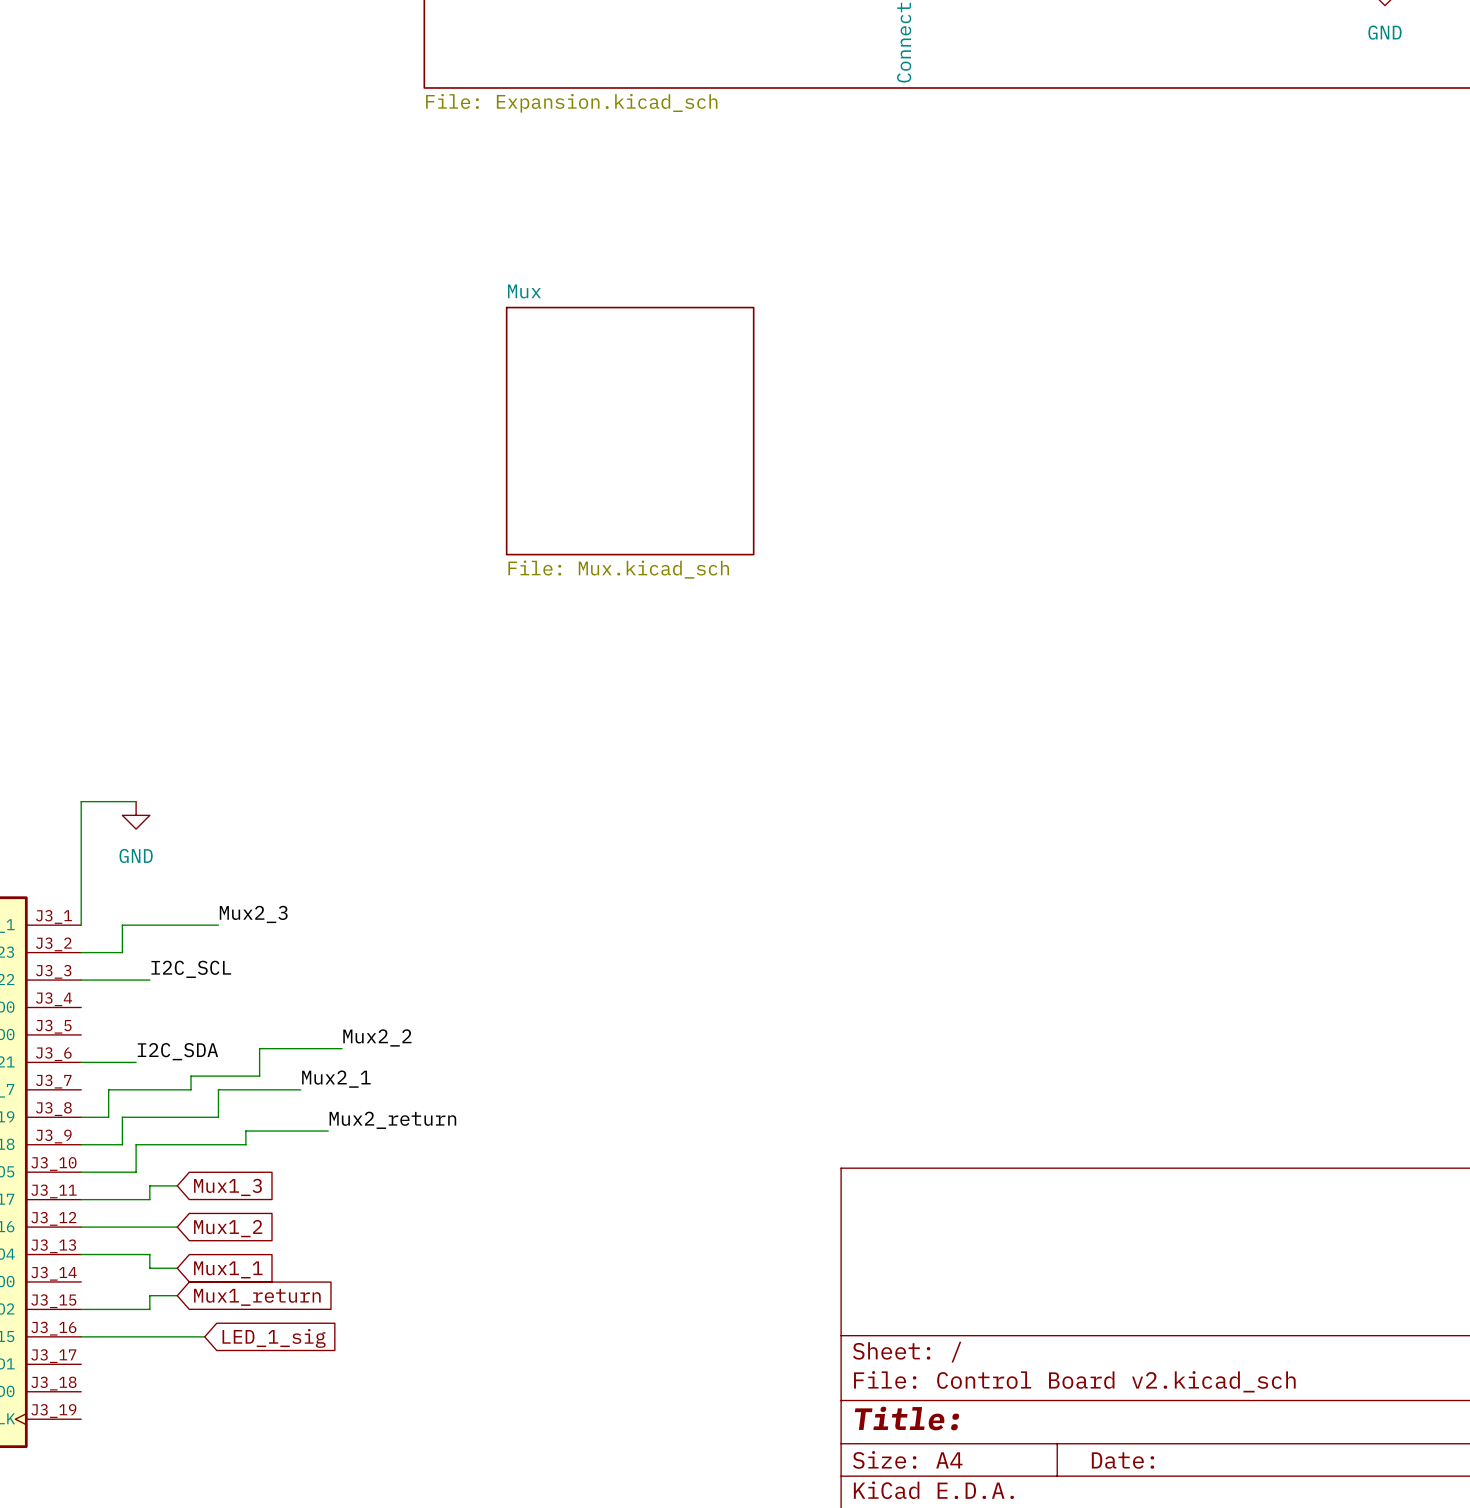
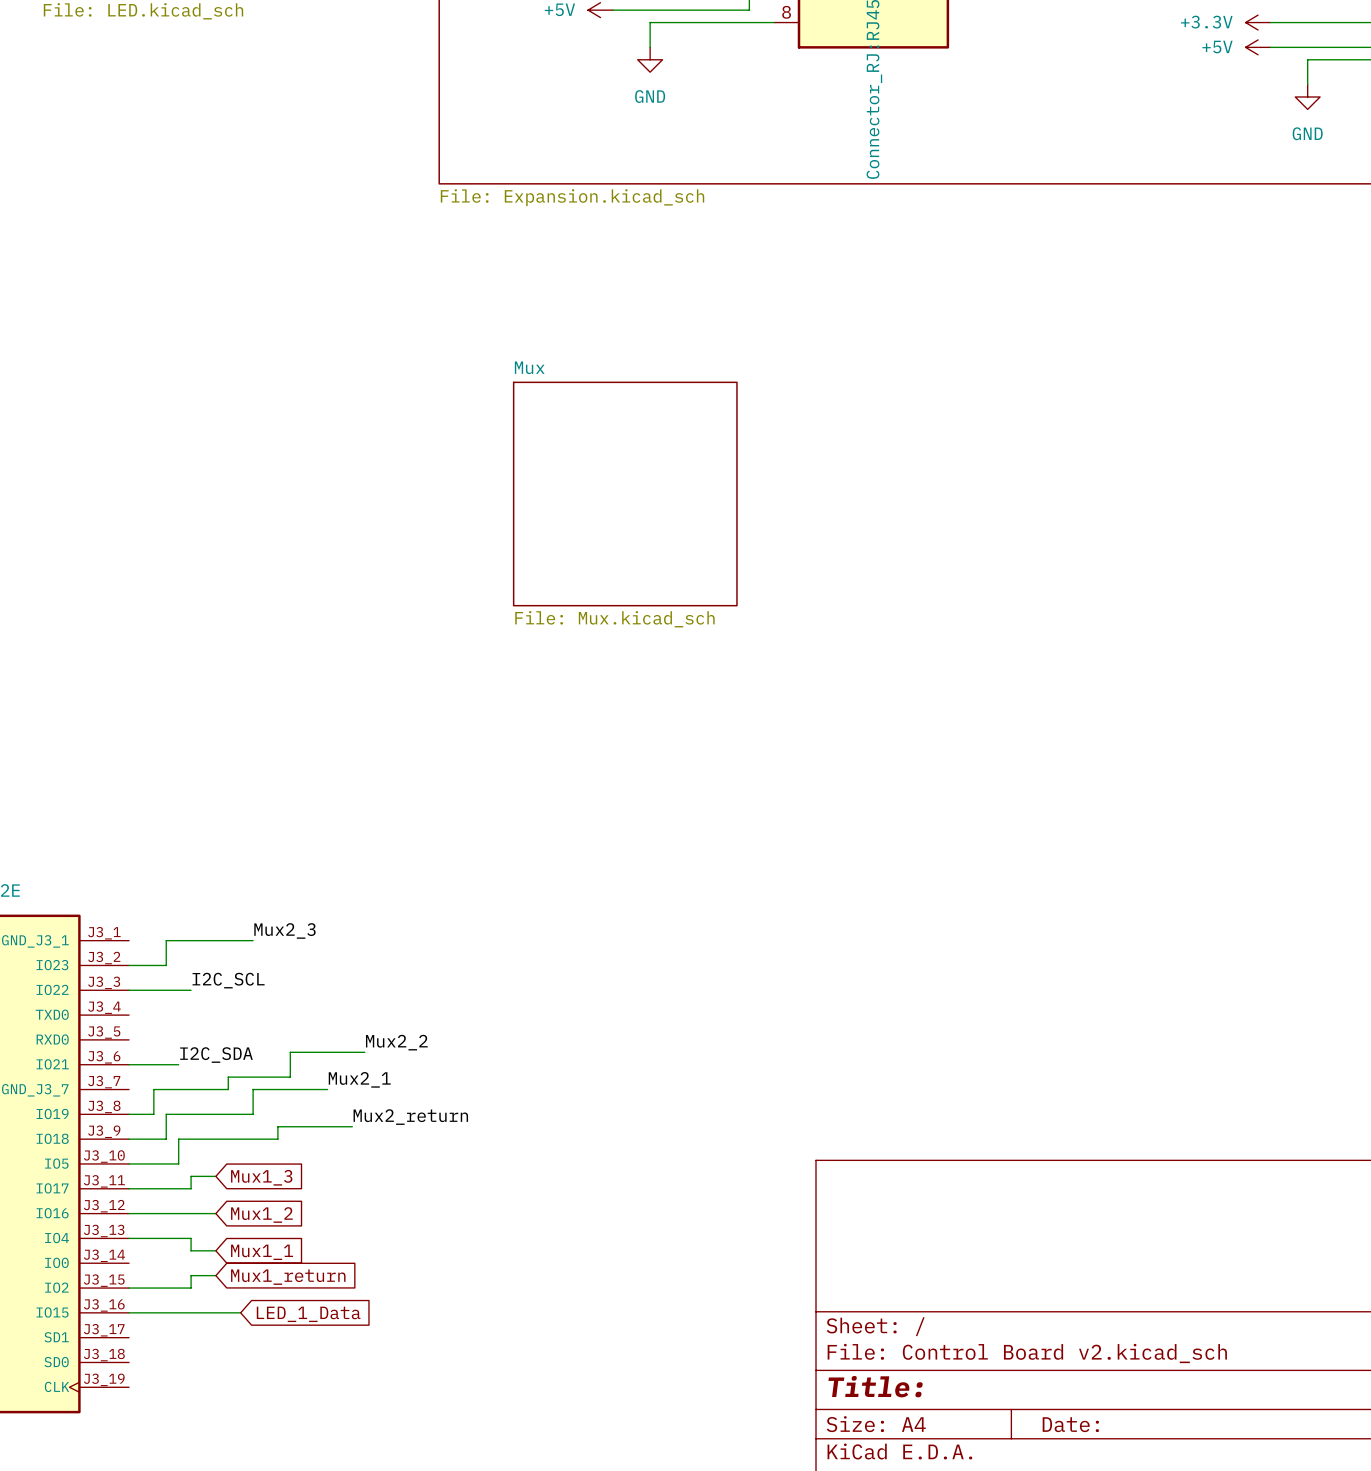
wire: (136, 801) (81, 801) (81, 925) -> none
power symbol: GND (136, 815) -> none
global label: LED_1_sig (274, 1338) -> LED_1_Data (308, 1314)

